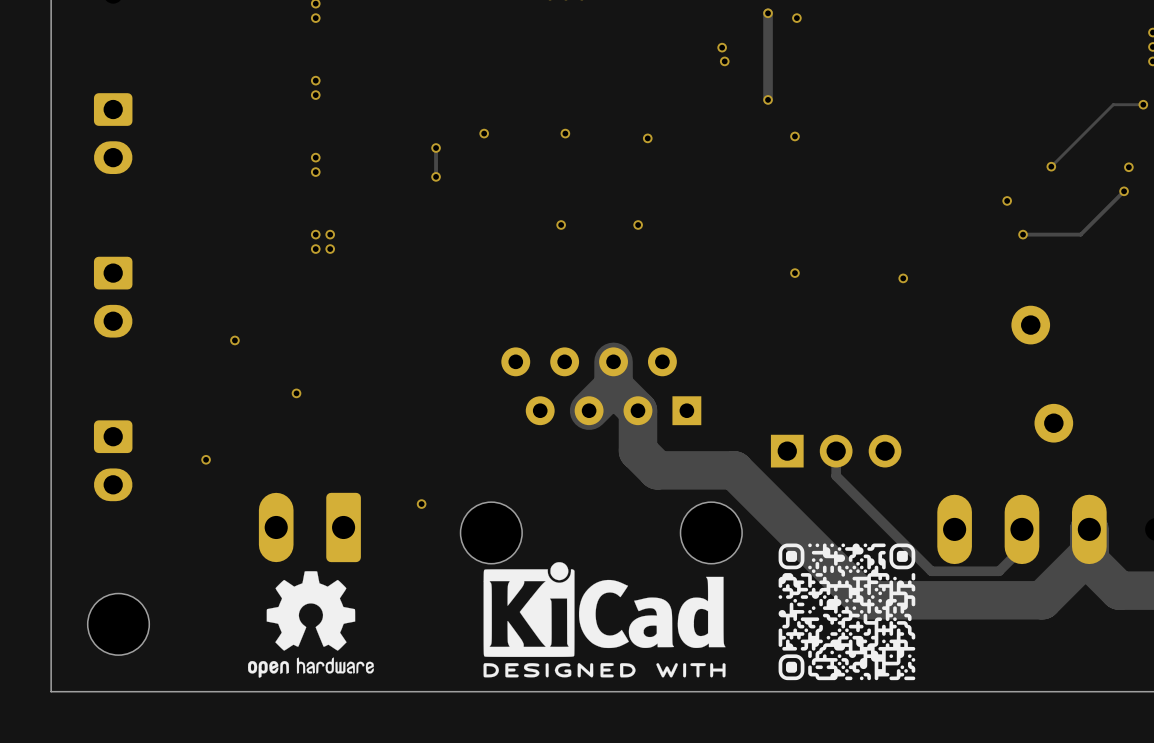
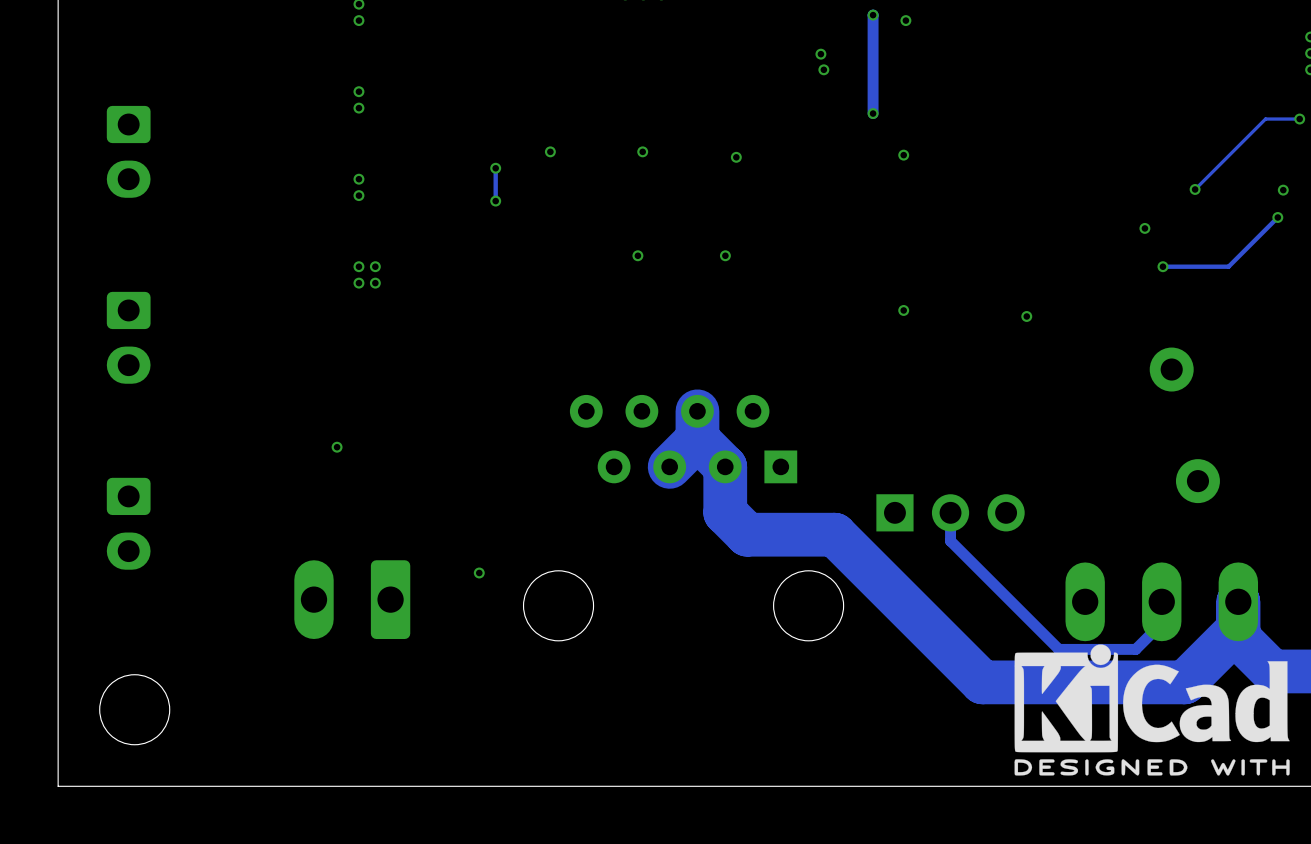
via: (234, 340) -> none
via: (206, 459) -> none
drawing: [778, 543, 916, 681] -> none
drawing: [248, 571, 374, 678] -> none
drawing position: (604, 619) -> (1152, 710)

